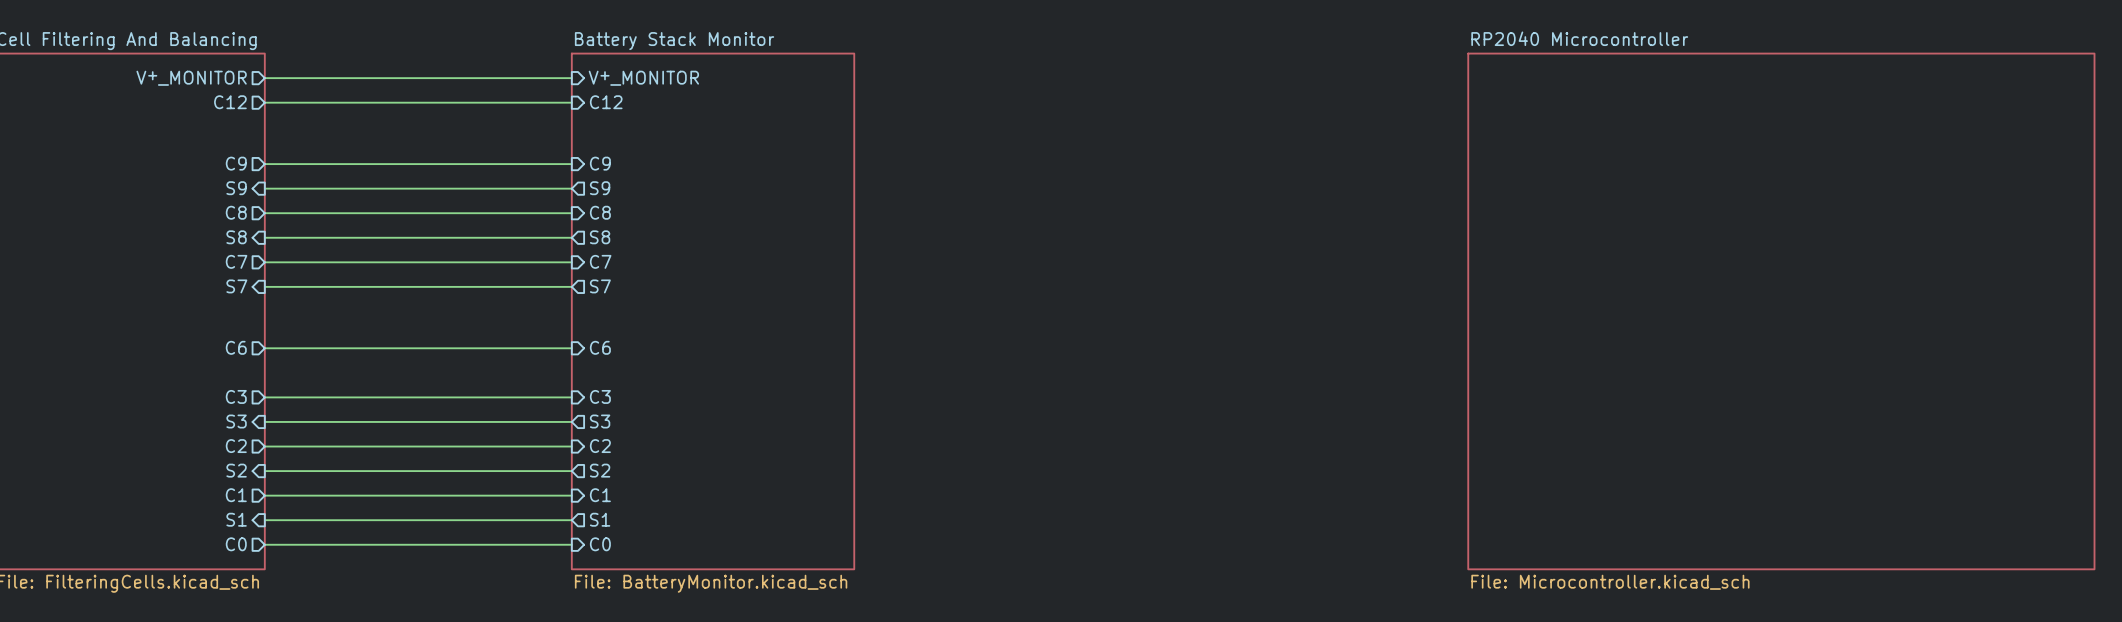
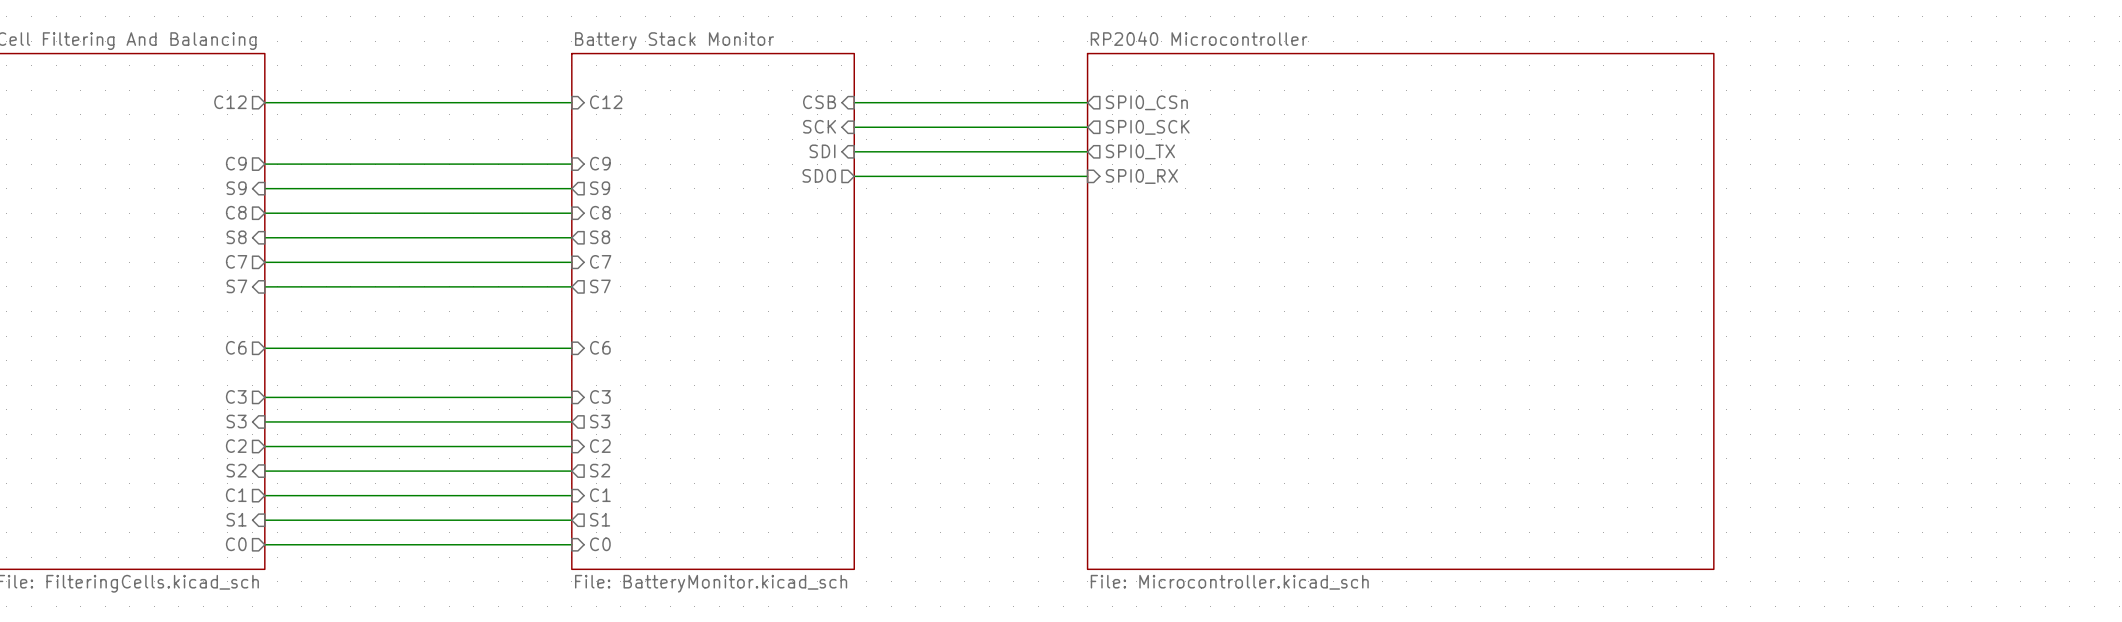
sheet pin: V+_MONITOR (191, 78) -> none
wire: (264, 78) (571, 78) -> none
sheet pin: V+_MONITOR (643, 78) -> none
sheet pin: none -> CSB (819, 102)
wire: none -> (854, 102) (1087, 102)
sheet pin: none -> SPI0_CSn (1146, 102)
sheet pin: none -> SCK (819, 126)
wire: none -> (854, 127) (1087, 127)
sheet pin: none -> SPI0_SCK (1147, 127)
sheet pin: none -> SDI (822, 151)
wire: none -> (854, 151) (1087, 151)
sheet pin: none -> SPI0_TX (1140, 151)
sheet pin: none -> SDO (819, 175)
wire: none -> (854, 176) (1087, 176)
sheet pin: none -> SPI0_RX (1141, 176)
sheet RP2040 Microcontroller position: (1781, 311) -> (1400, 311)

